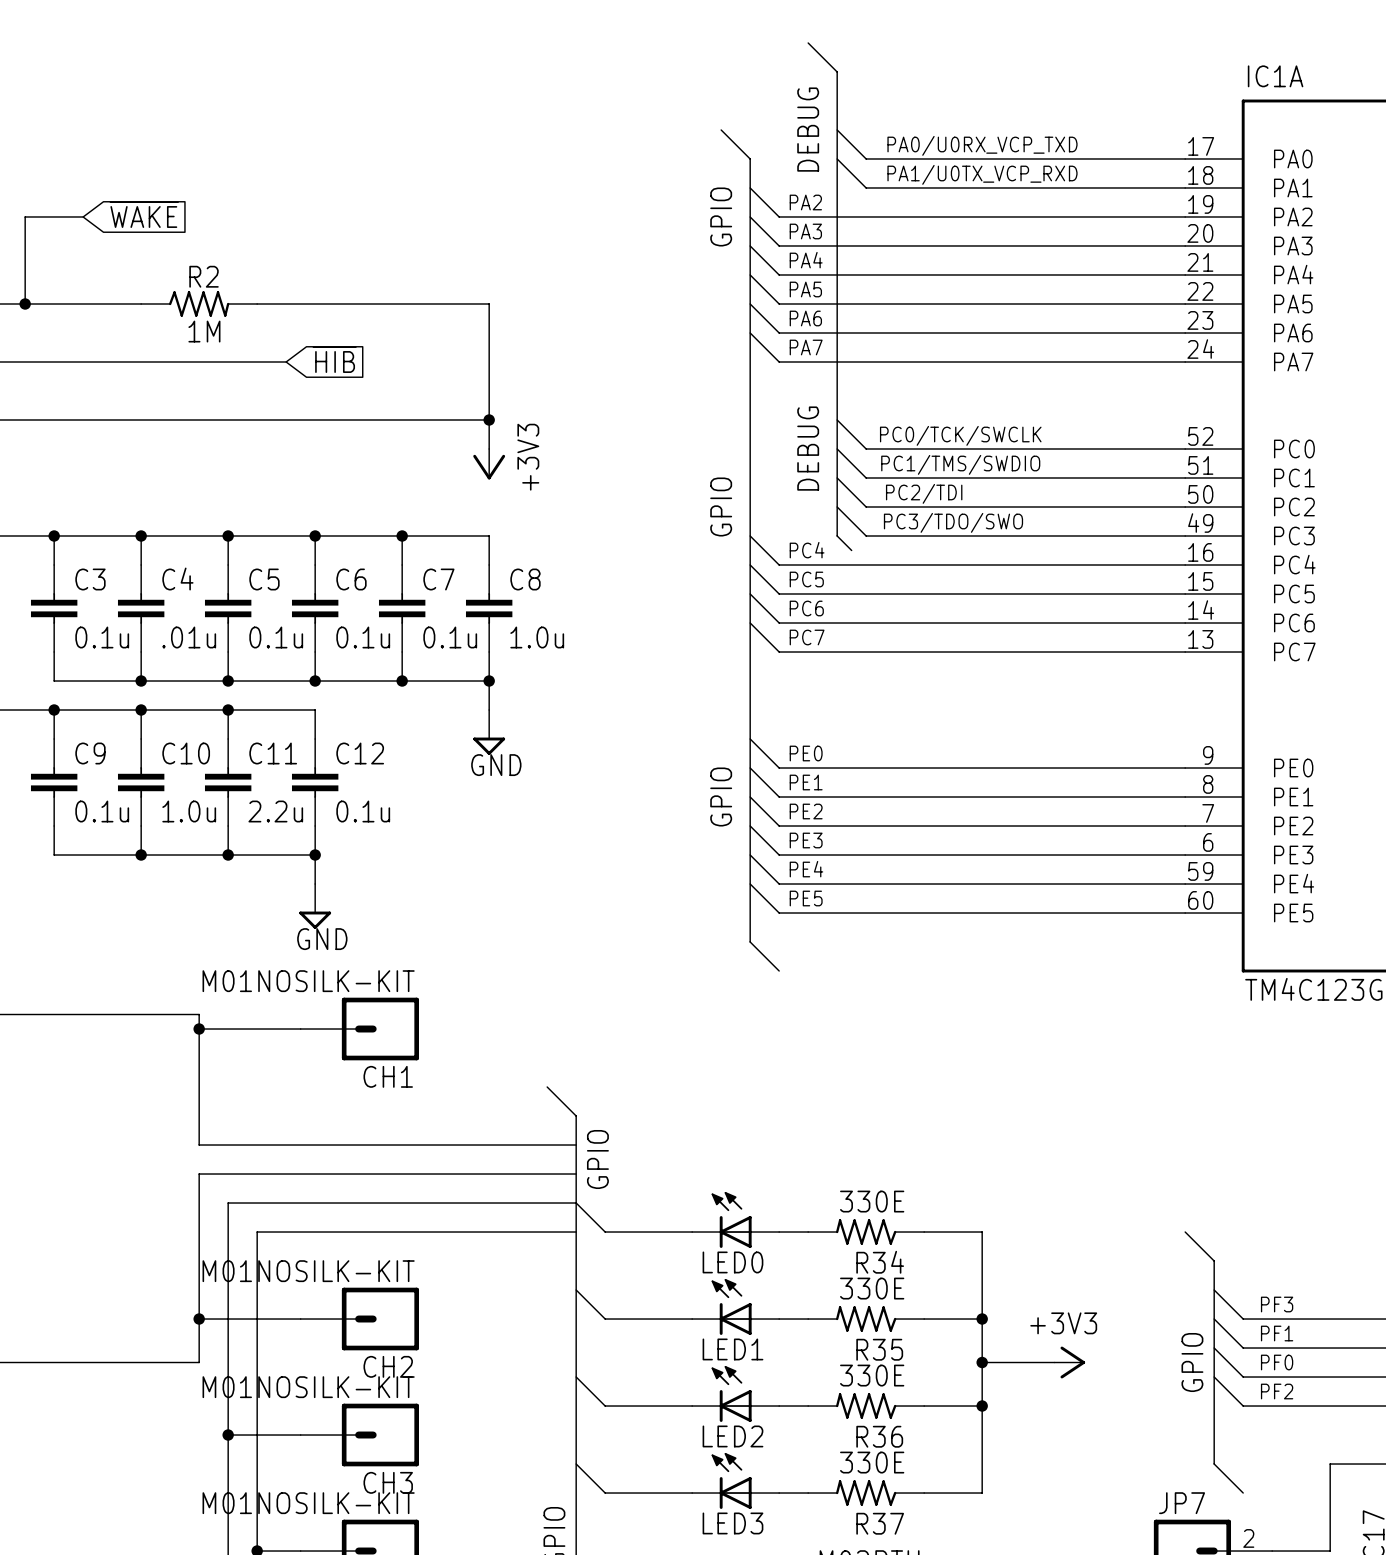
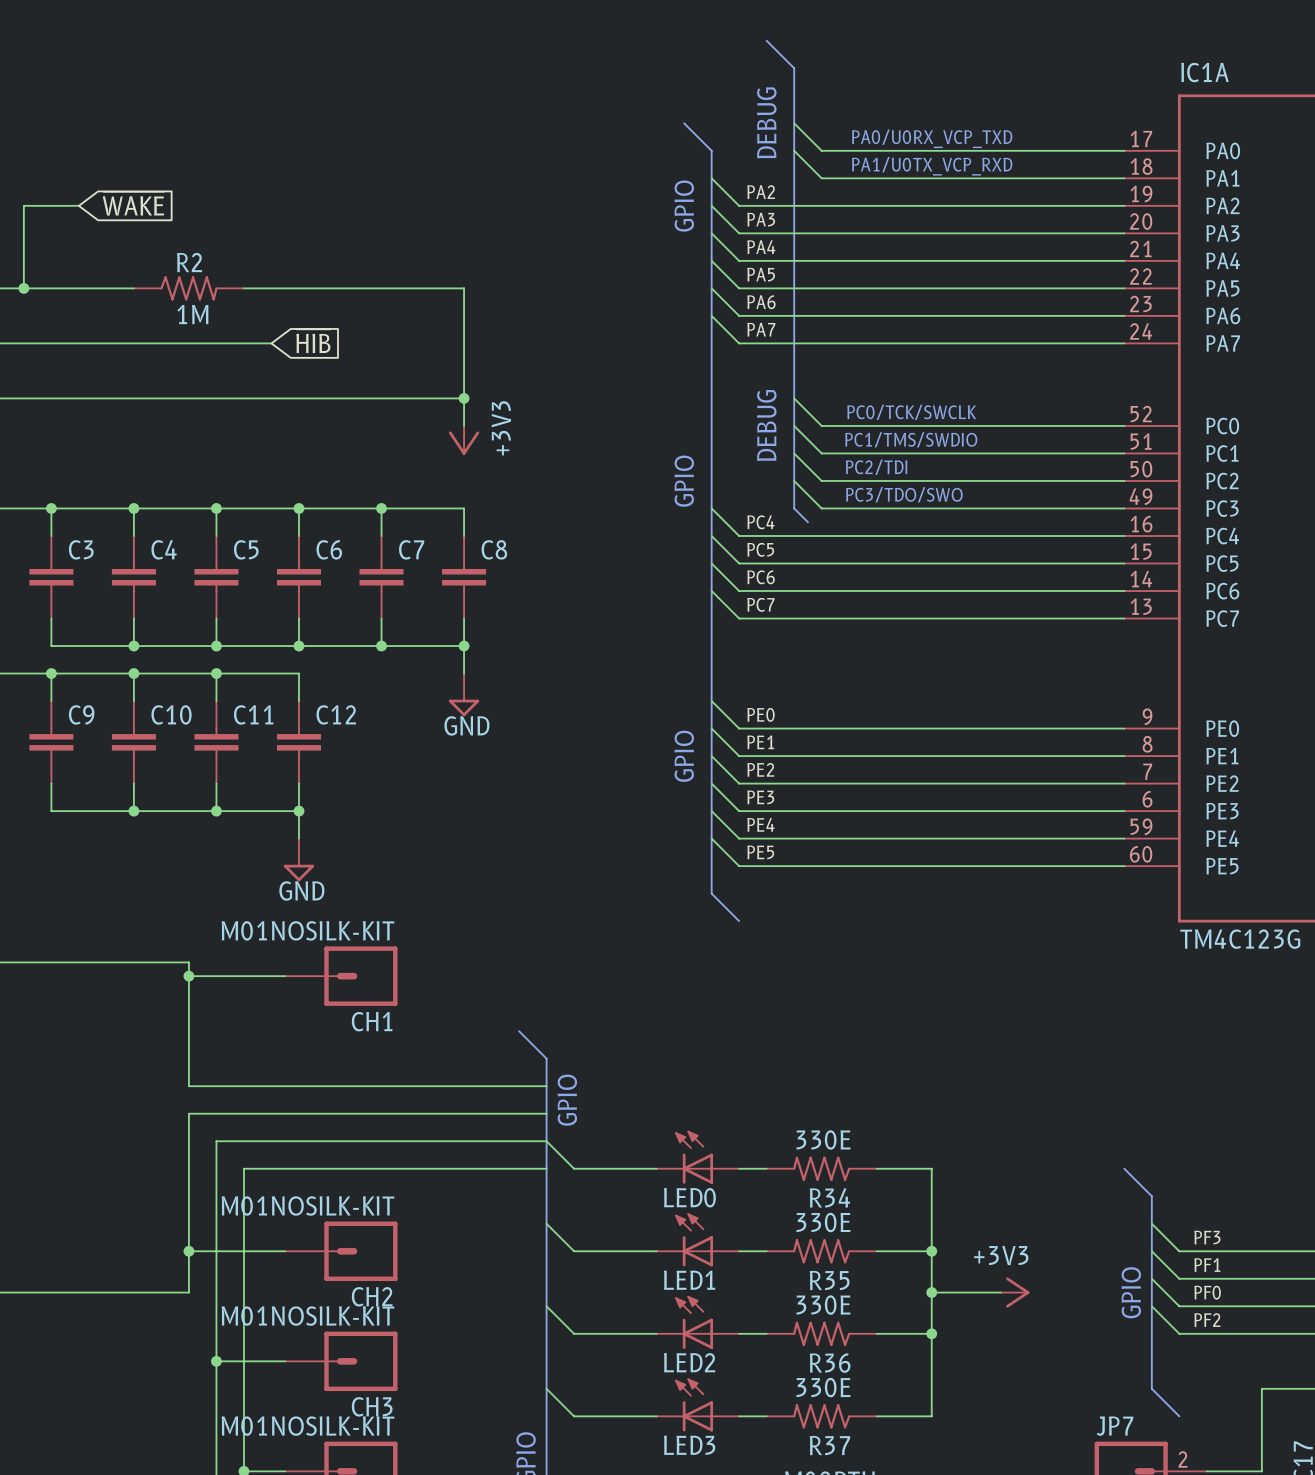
C3 value: 0.1u (102, 637) -> none
C4 value: .01u (189, 637) -> none
C5 value: 0.1u (276, 637) -> none
C6 value: 0.1u (363, 637) -> none
C7 value: 0.1u (450, 637) -> none
C8 value: 1.0u (537, 637) -> none
C9 value: 0.1u (102, 811) -> none
C10 value: 1.0u (189, 811) -> none
C11 value: 2.2u (275, 811) -> none
C12 value: 0.1u (363, 811) -> none

